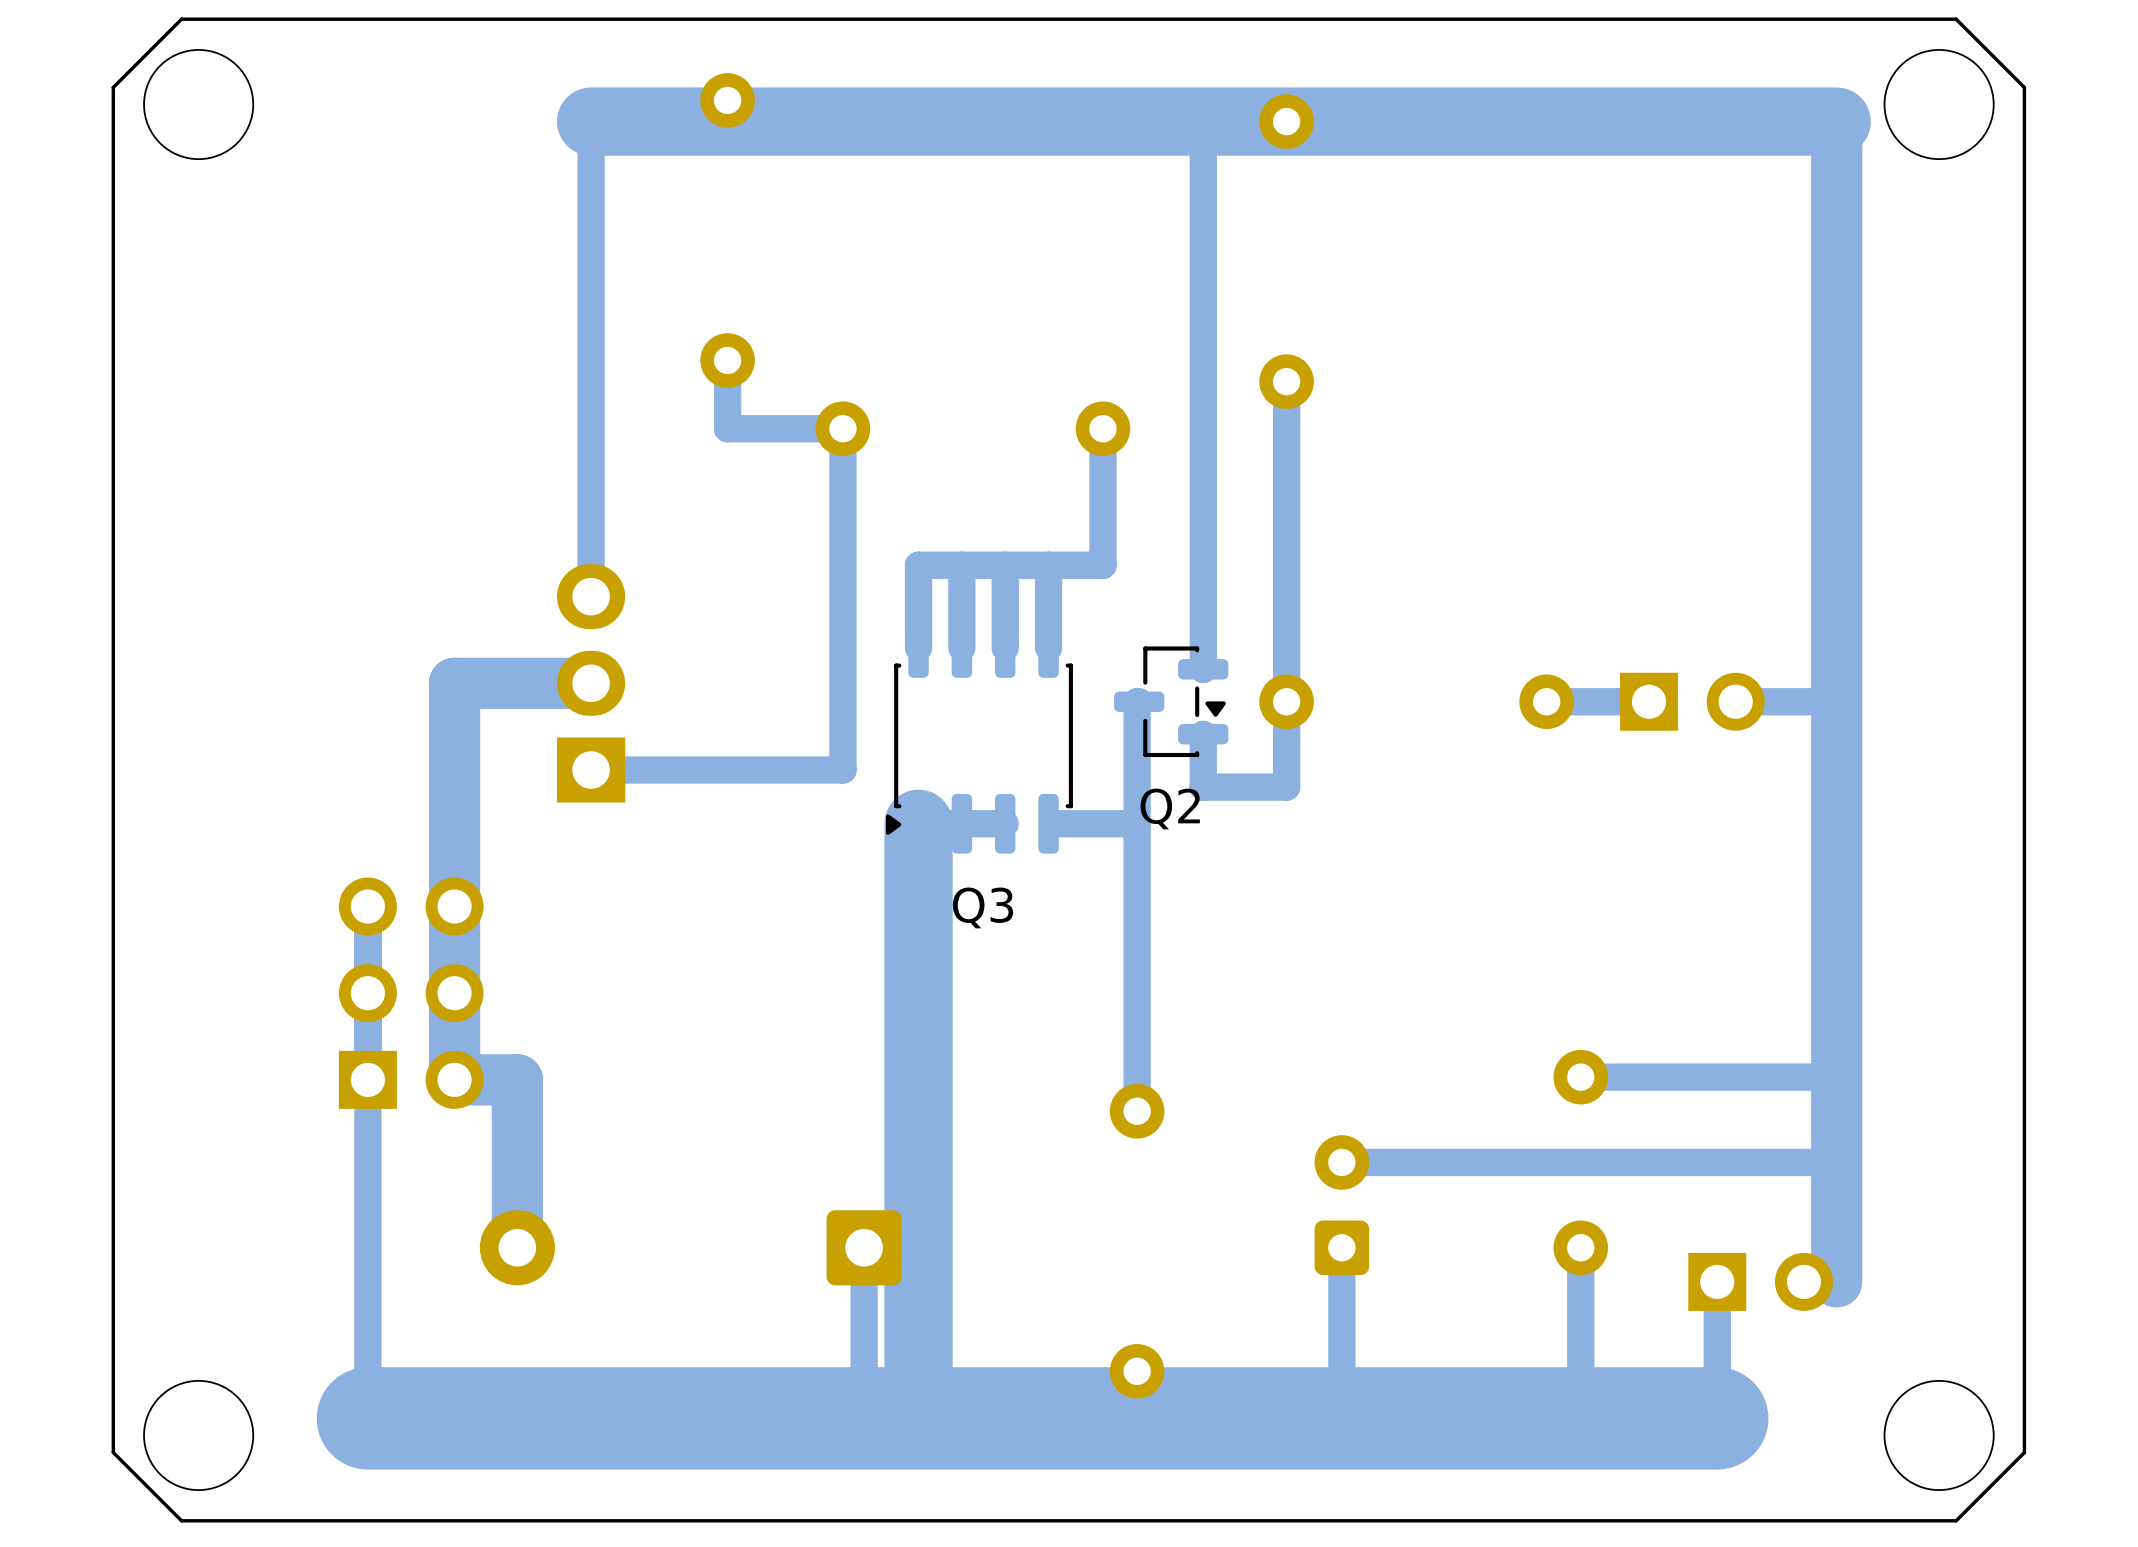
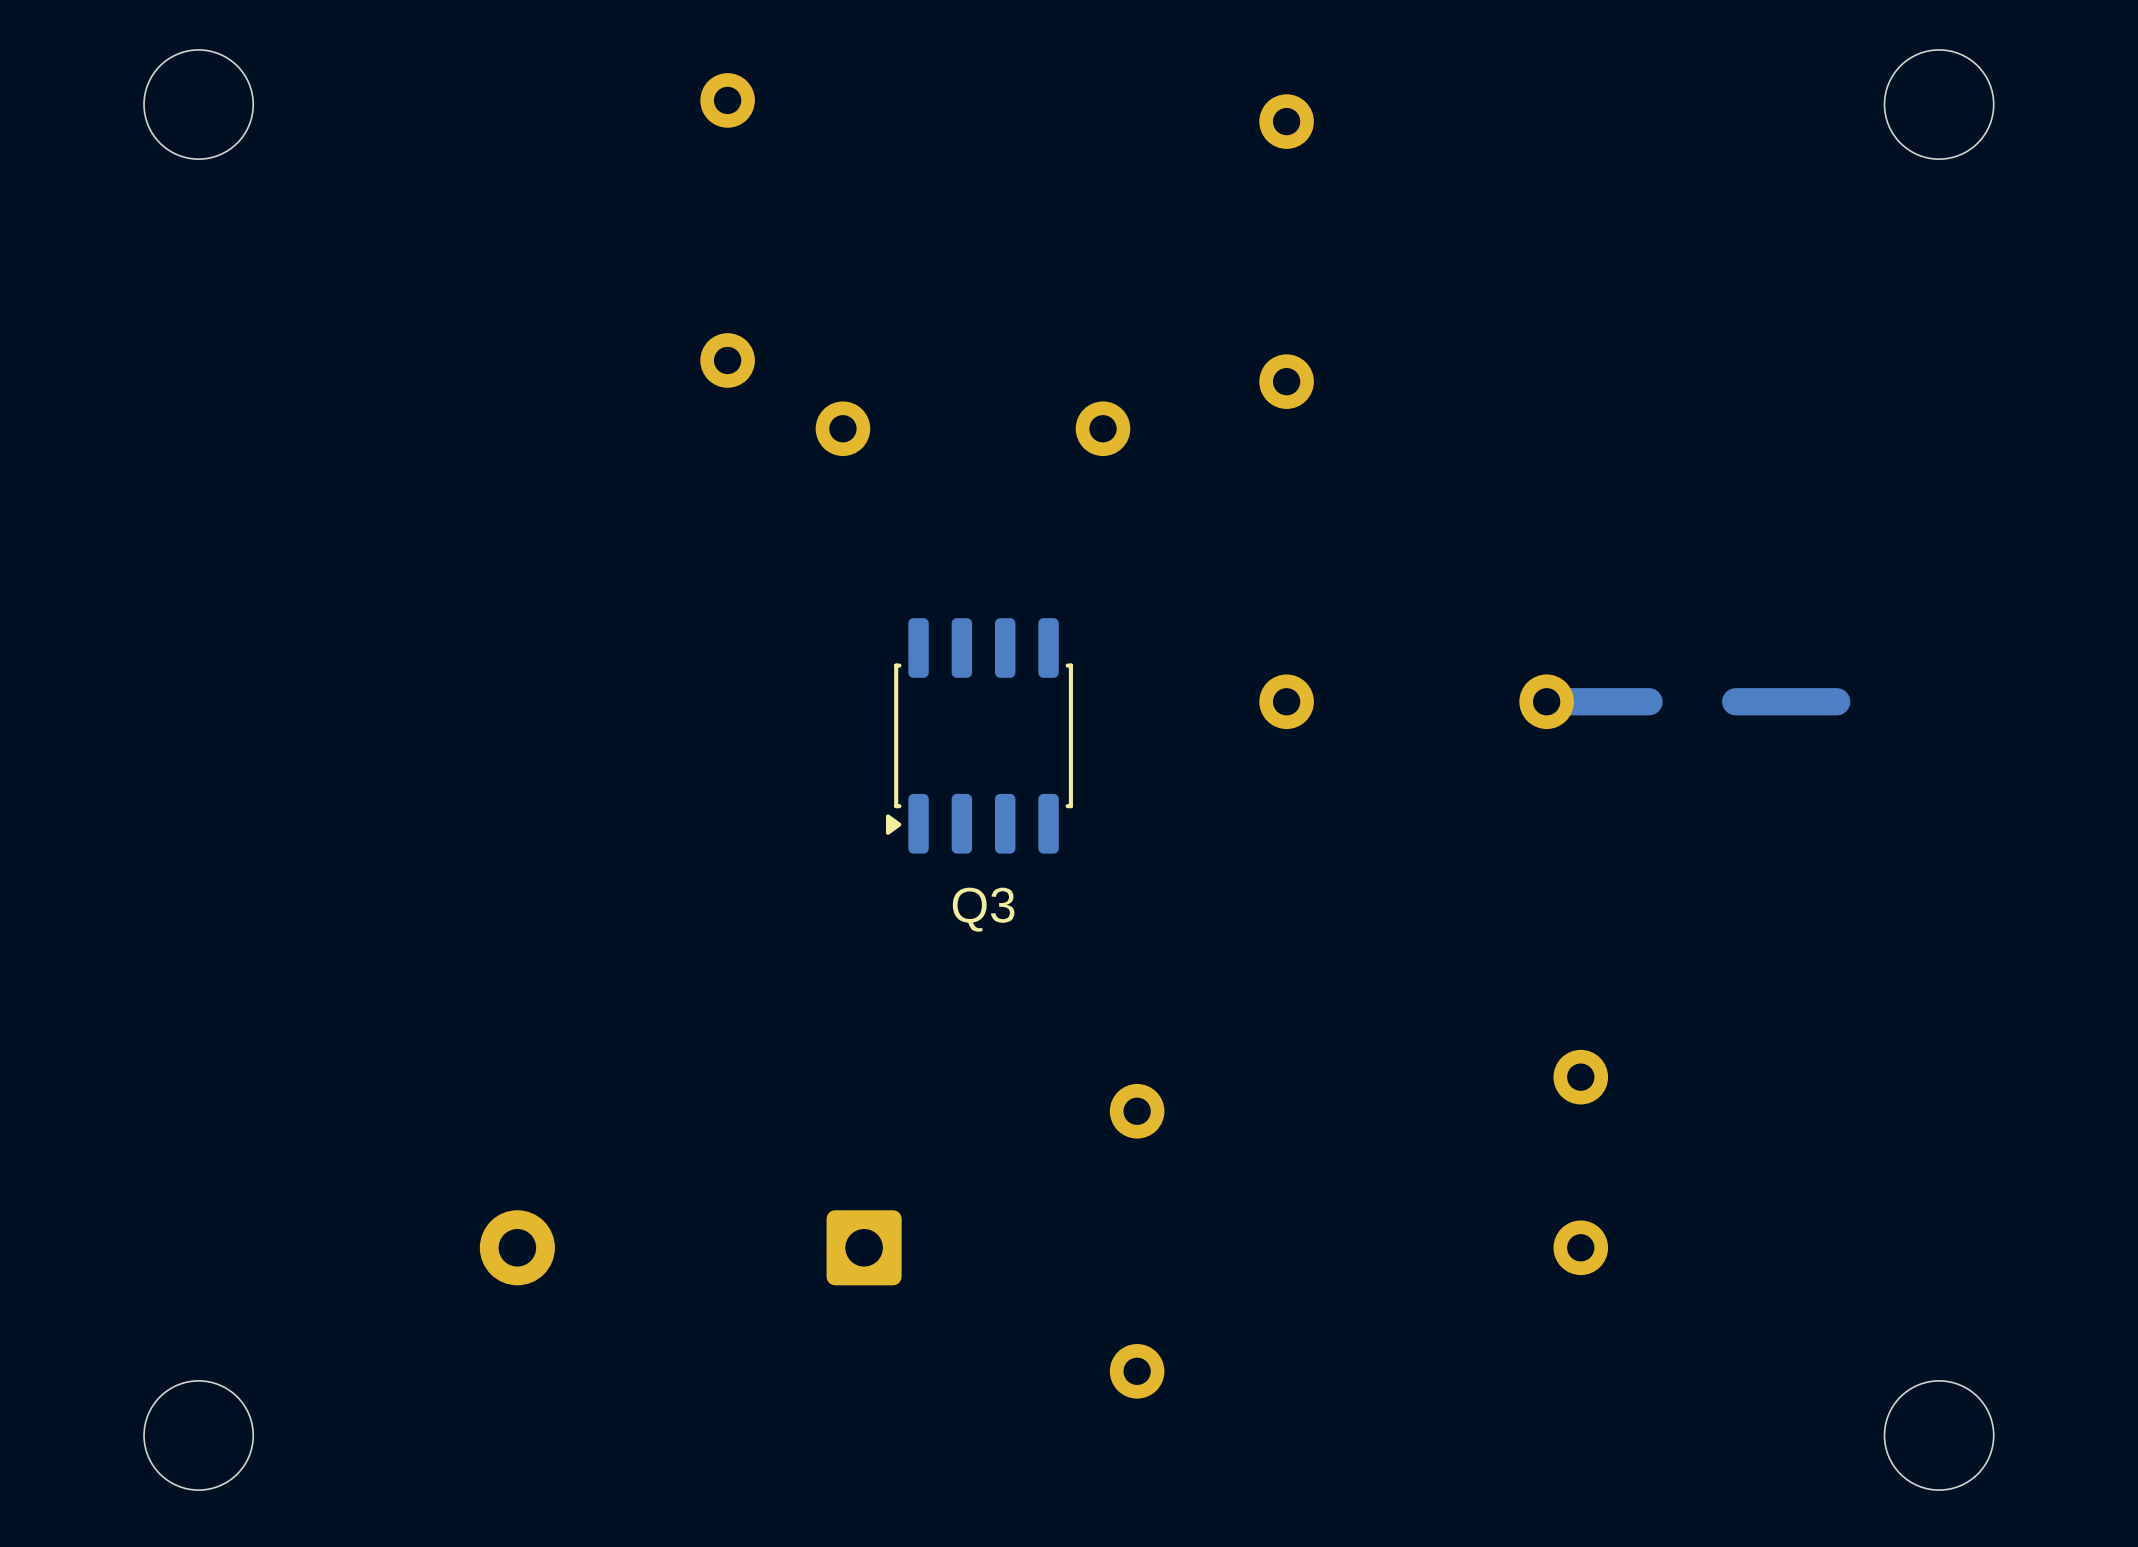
board edge: (1956, 19) (181, 19) (113, 87) (113, 1452) (181, 1520) (1956, 1520) (2024, 1452) (2024, 87) (1956, 19) -> none
track: (1203, 121) (1203, 669) -> none
track: (727, 360) (727, 428) (842, 428) (842, 770) (591, 770) -> none
track: (1286, 381) (1286, 787) (1203, 787) (1203, 734) -> none
track: (1103, 428) (1103, 565) (918, 565) (918, 648) -> none
track: (961, 565) (961, 648) -> none
track: (1005, 565) (1005, 648) -> none
track: (1048, 565) (1048, 648) -> none
track: (591, 596) (591, 121) (1836, 121) (1836, 1281) (1803, 1281) -> none
track: (591, 683) (454, 683) (454, 1079) (517, 1079) (517, 1247) -> none
part: (591, 683) -> none
track: (1139, 701) (1137, 701) (1137, 1111) -> none
Q2: (1171, 701) -> none
part: (1692, 701) -> none
track: (1005, 823) (918, 823) (918, 1418) -> none
track: (1137, 823) (1055, 823) -> none
track: (367, 906) (367, 1418) (1717, 1418) (1717, 1281) -> none
part: (411, 993) -> none
track: (1836, 1077) (1580, 1077) -> none
track: (1836, 1162) (1341, 1162) -> none
part: (1341, 1205) -> none
track: (864, 1247) (864, 1418) -> none
track: (1341, 1247) (1341, 1418) -> none
track: (1580, 1247) (1580, 1418) -> none
part: (1760, 1281) -> none

